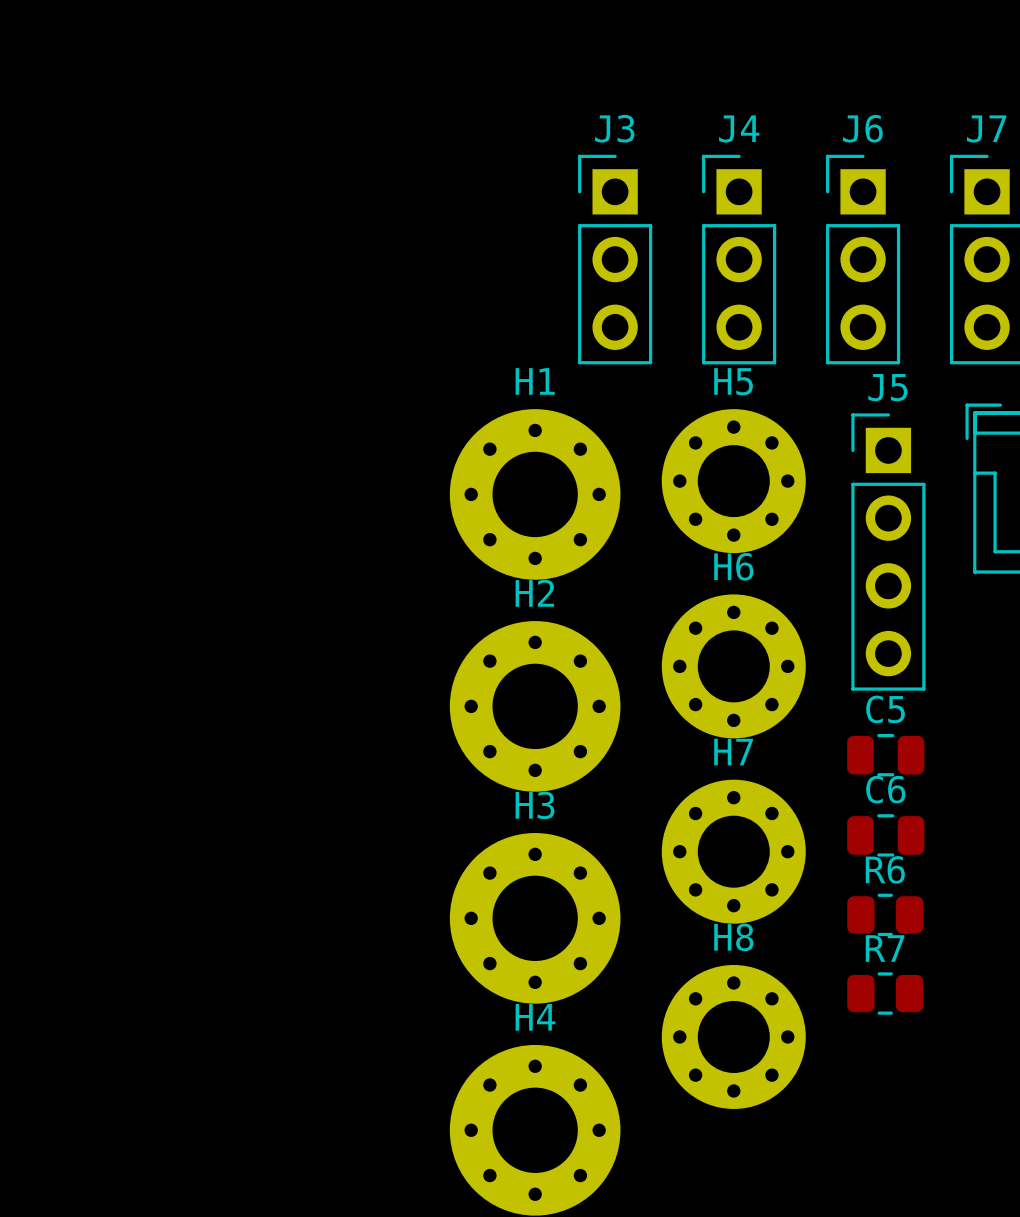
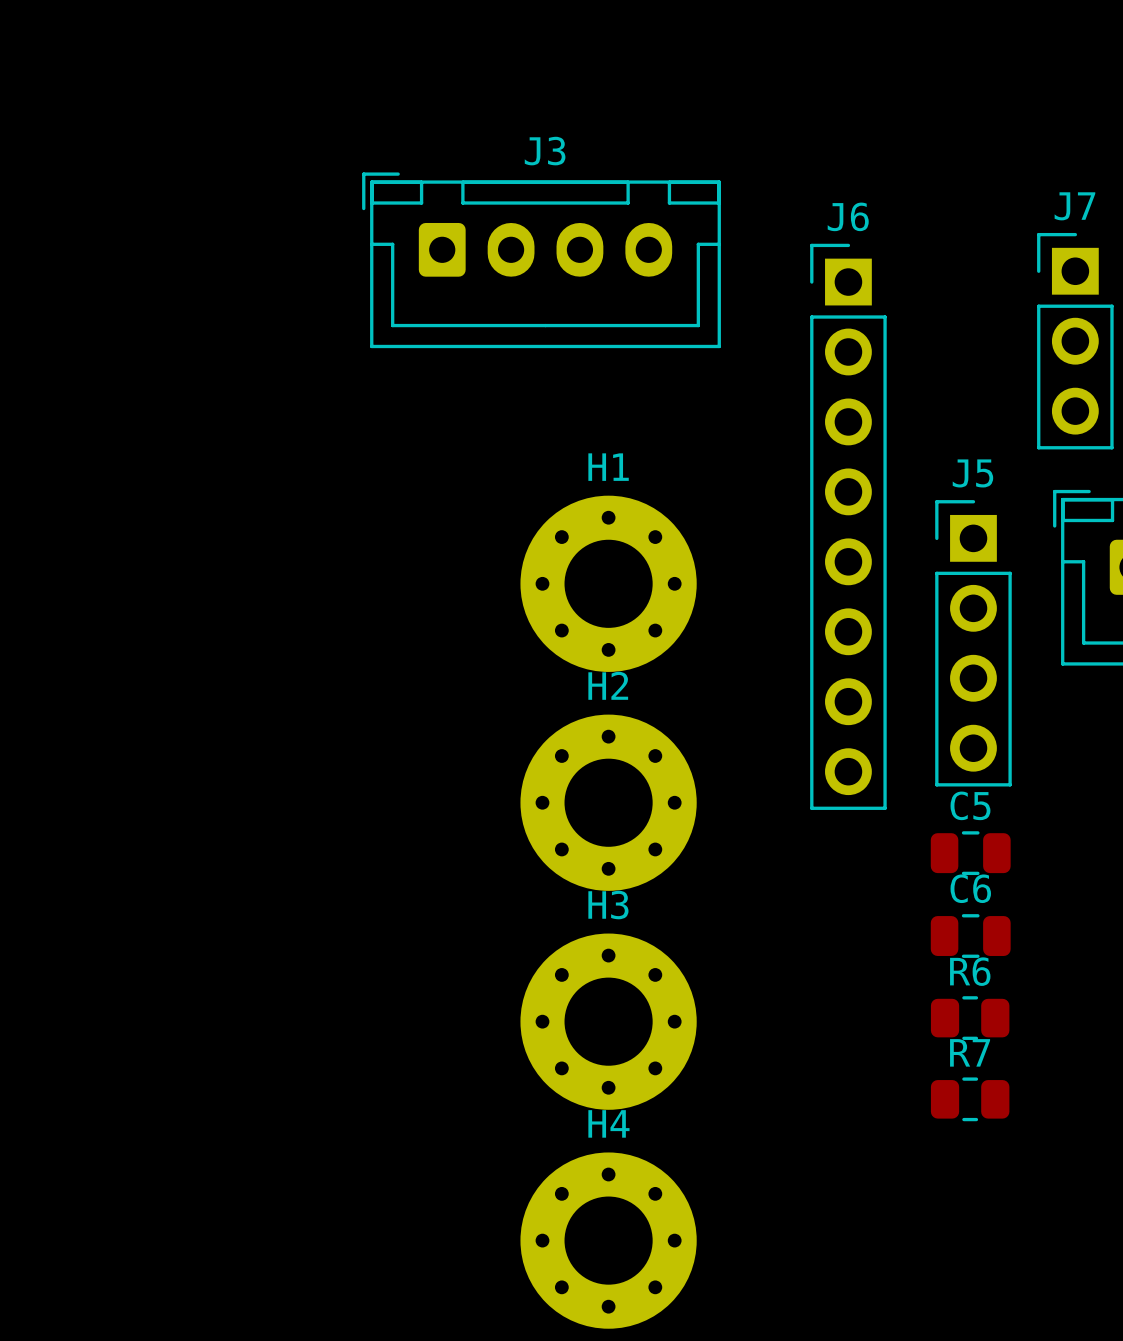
J6 name position: J6 (862, 128) -> J6 (848, 216)
J3 footprint: [578, 154, 653, 365] -> [362, 172, 721, 349]
J6 footprint: [826, 154, 901, 365] -> [810, 243, 887, 810]
J4: (739, 259) -> none
H5: (733, 481) -> none
H6: (733, 666) -> none
H7: (733, 851) -> none
H8: (733, 1036) -> none

